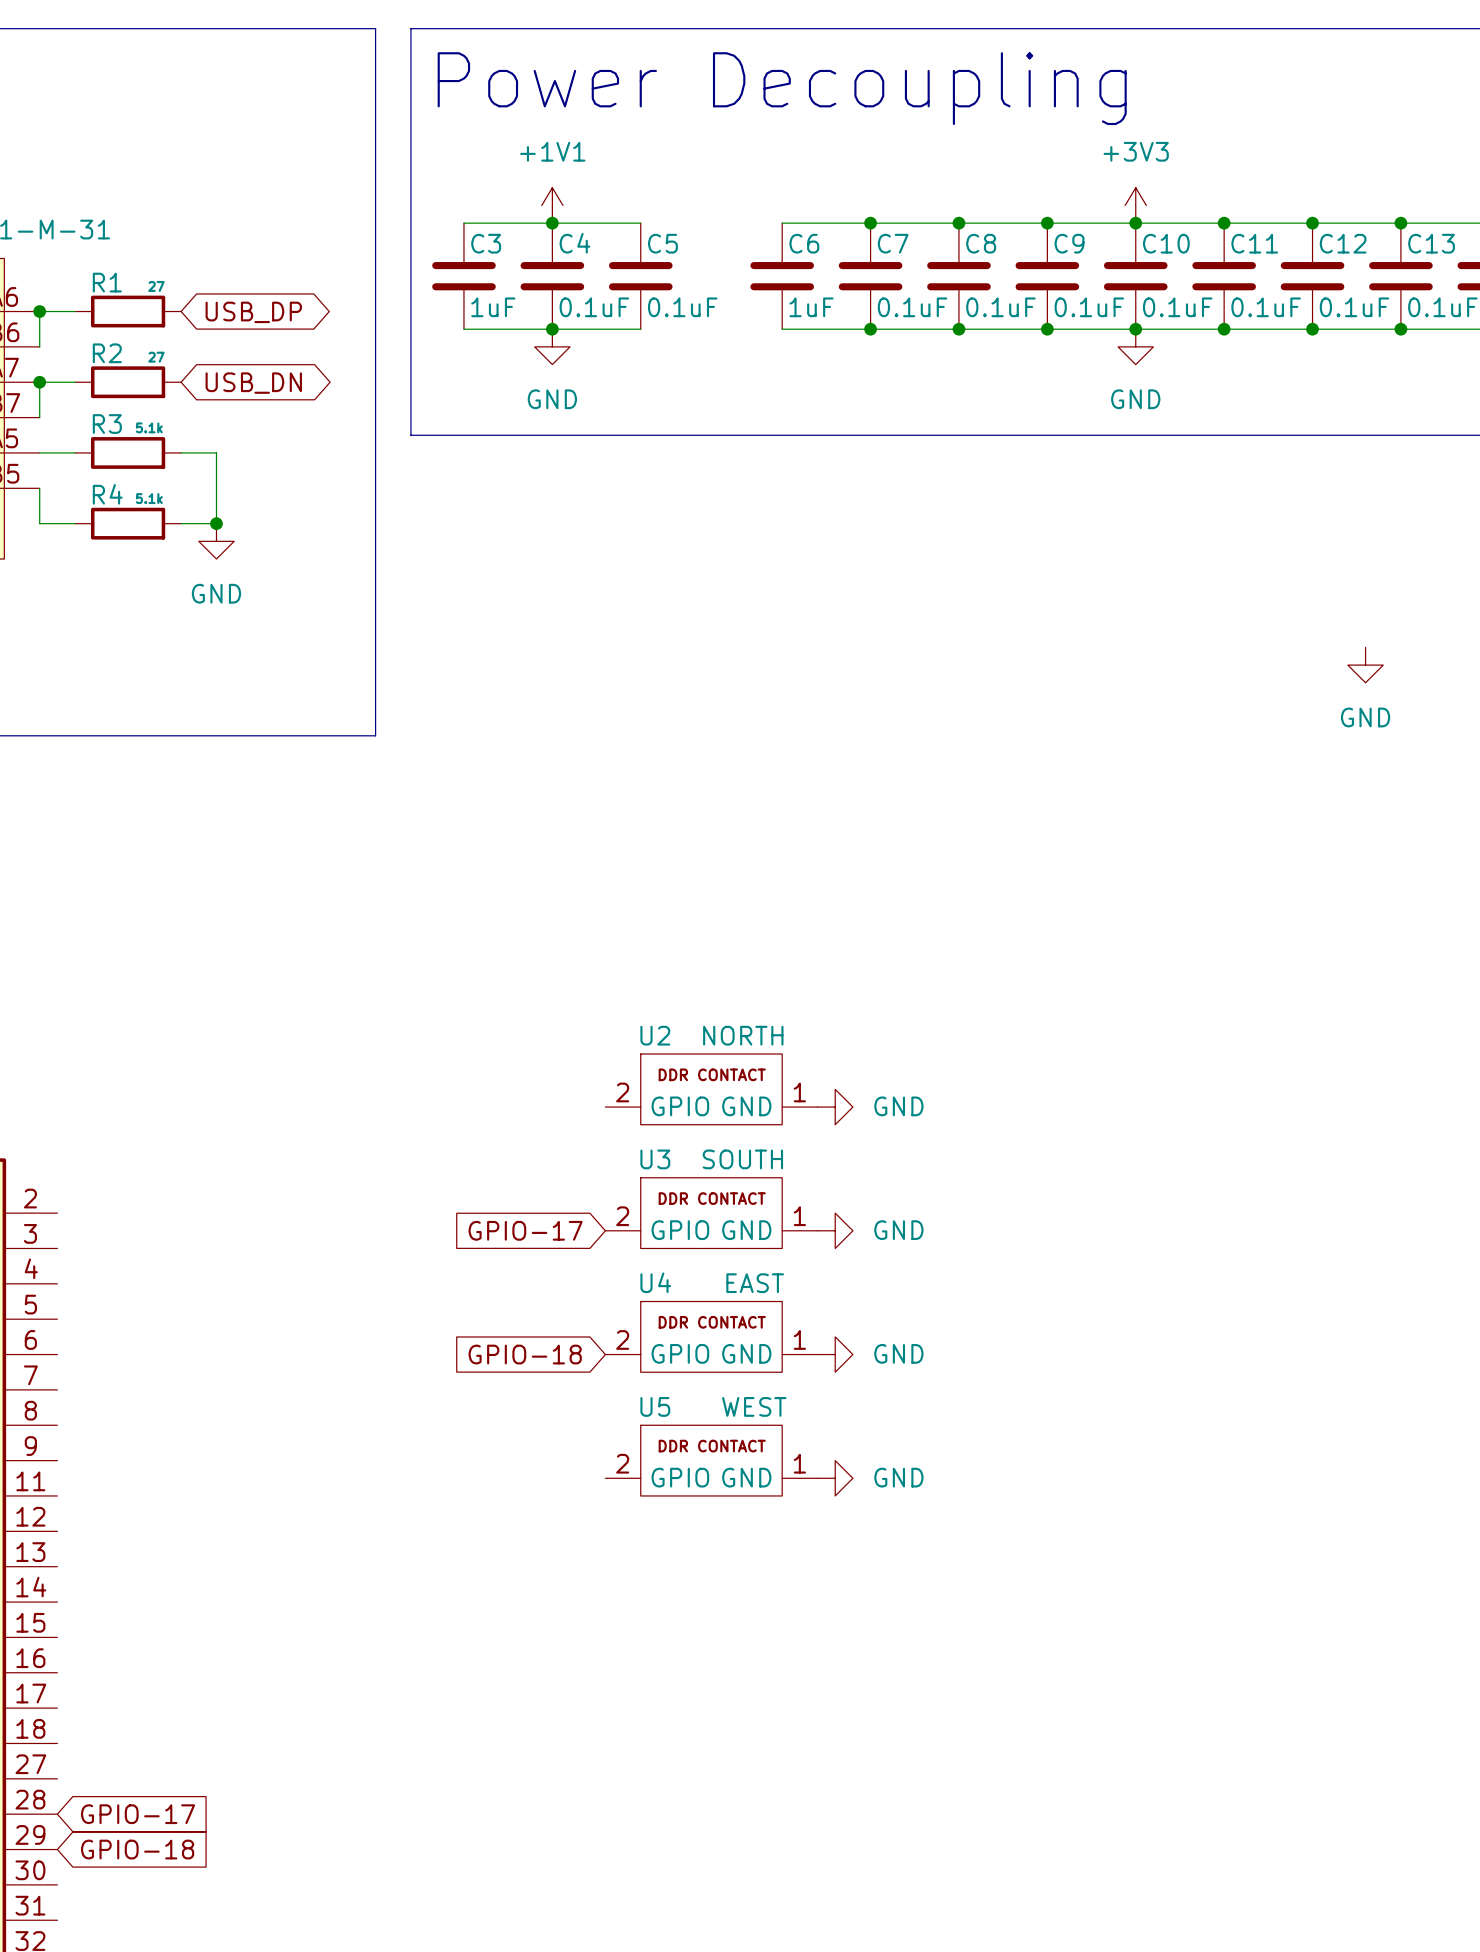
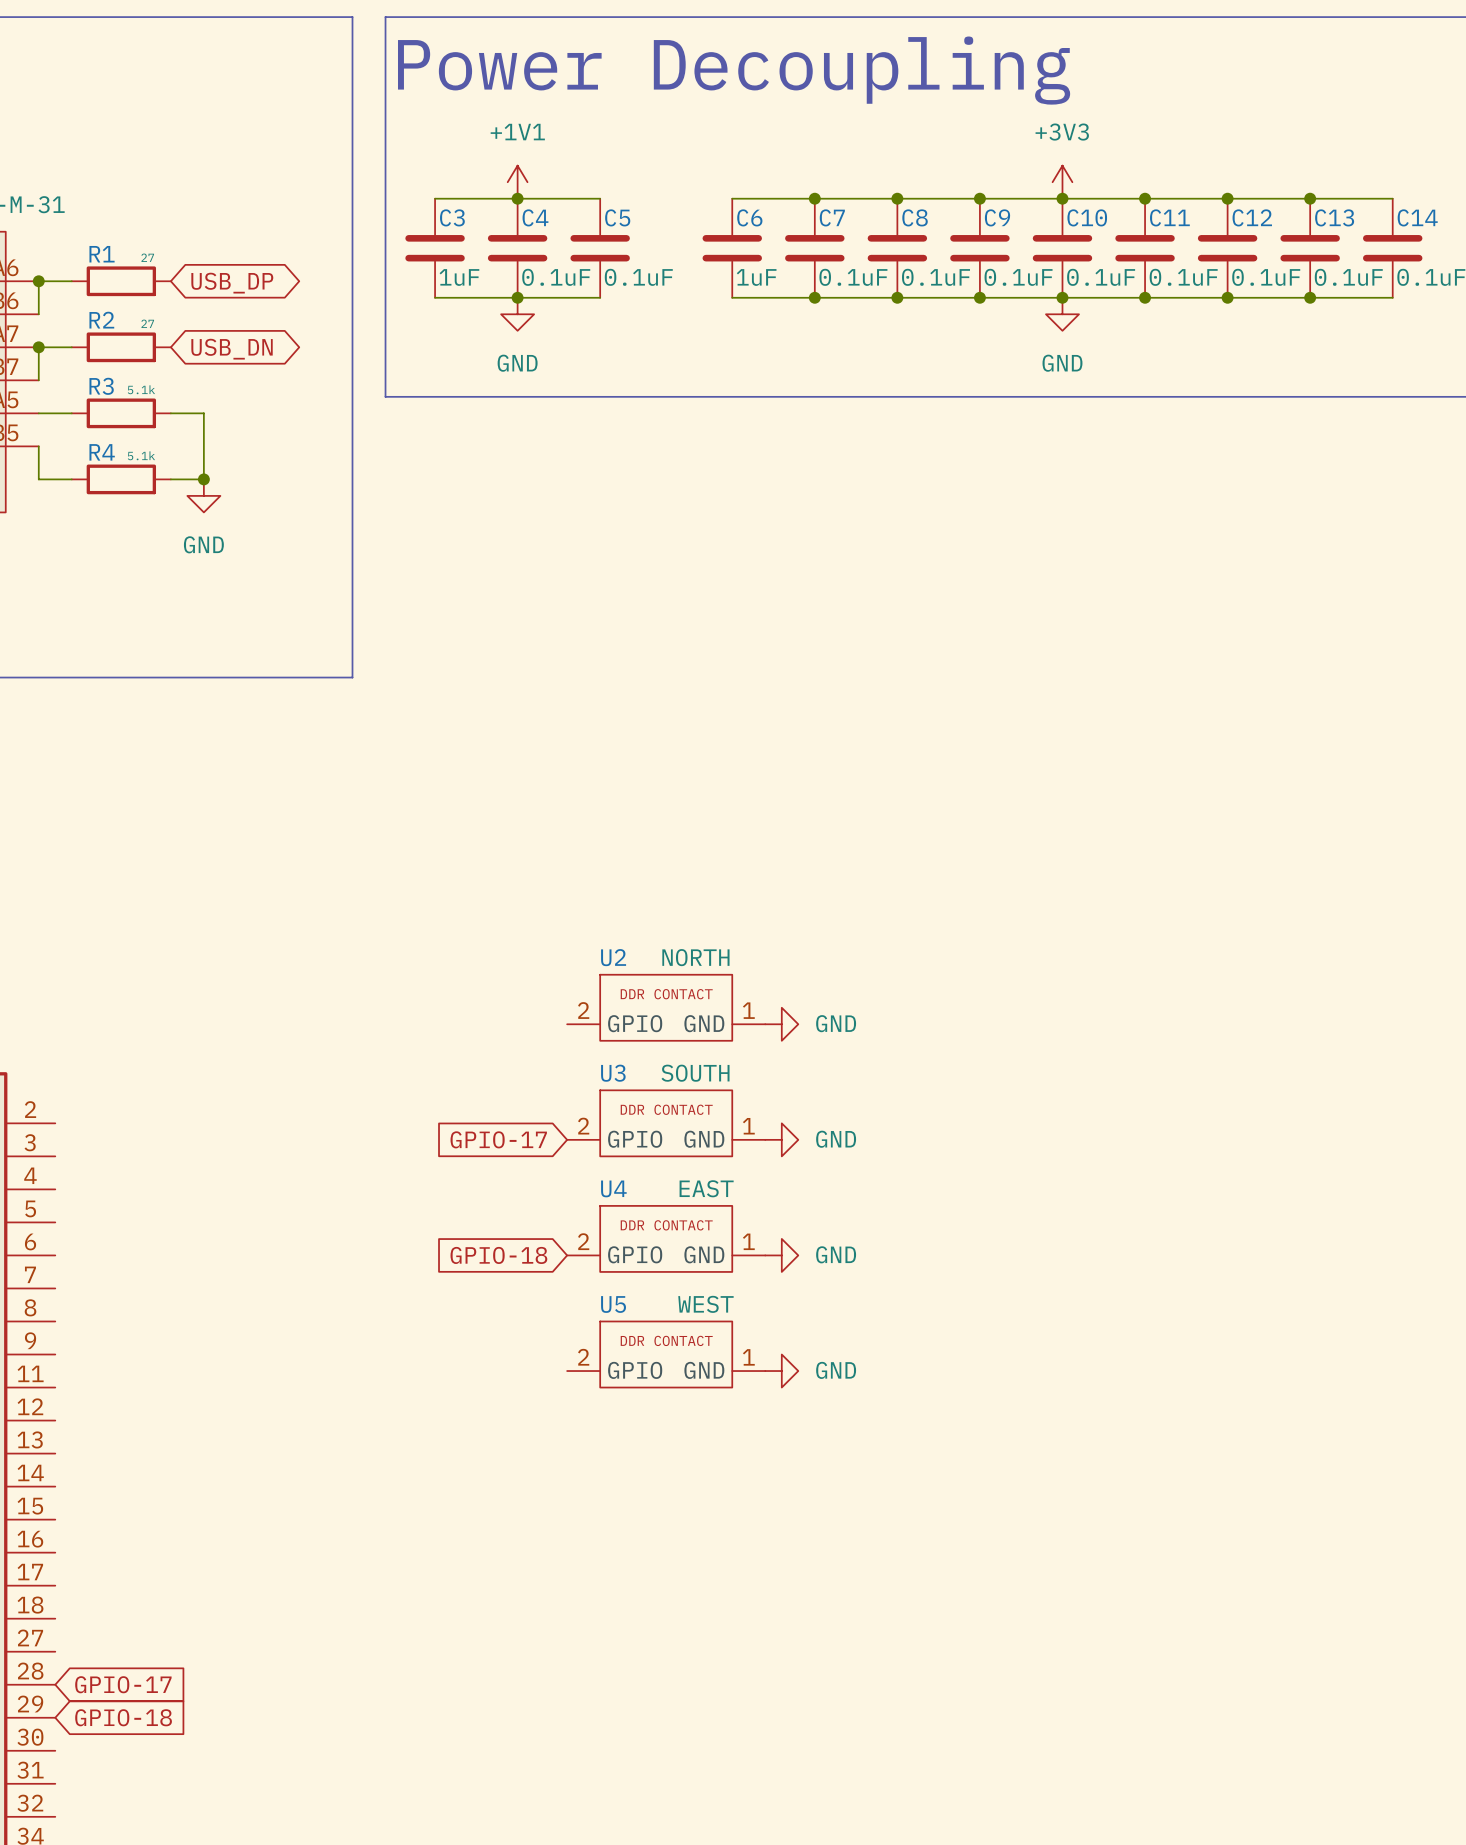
power symbol: GND (1365, 665) -> none

